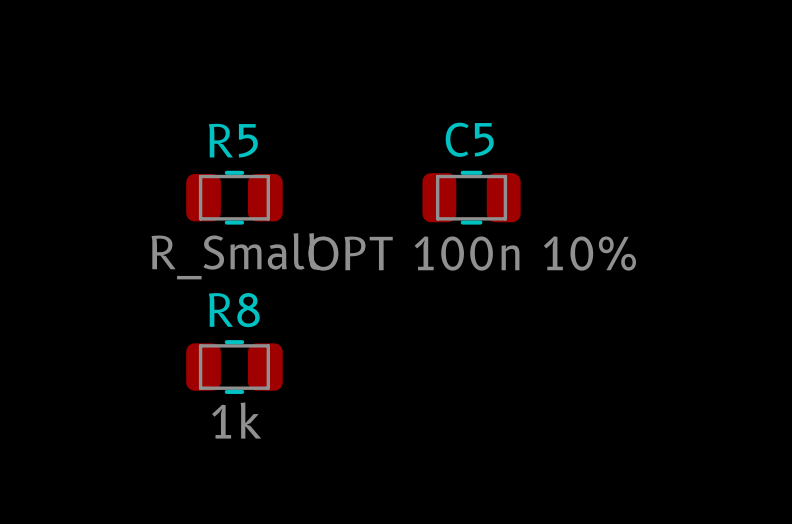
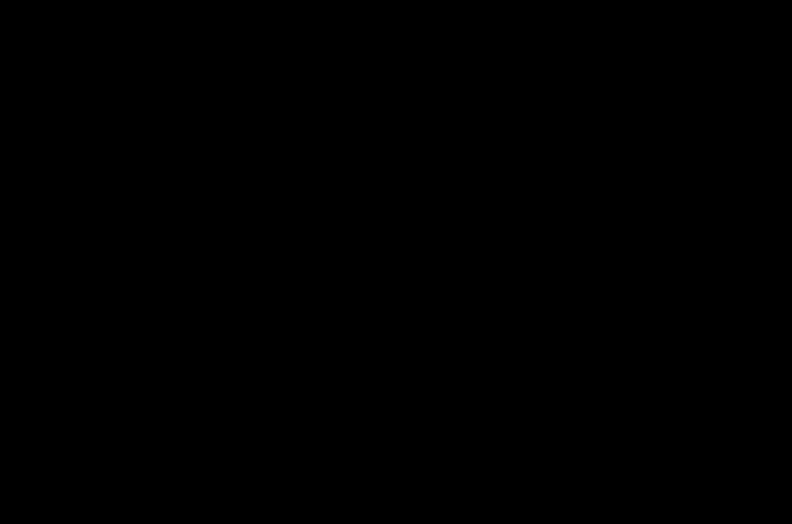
R5: R_Small (234, 197) -> none
C5: OPT 100n 10% (471, 197) -> none
R8: 1k (234, 367) -> none

